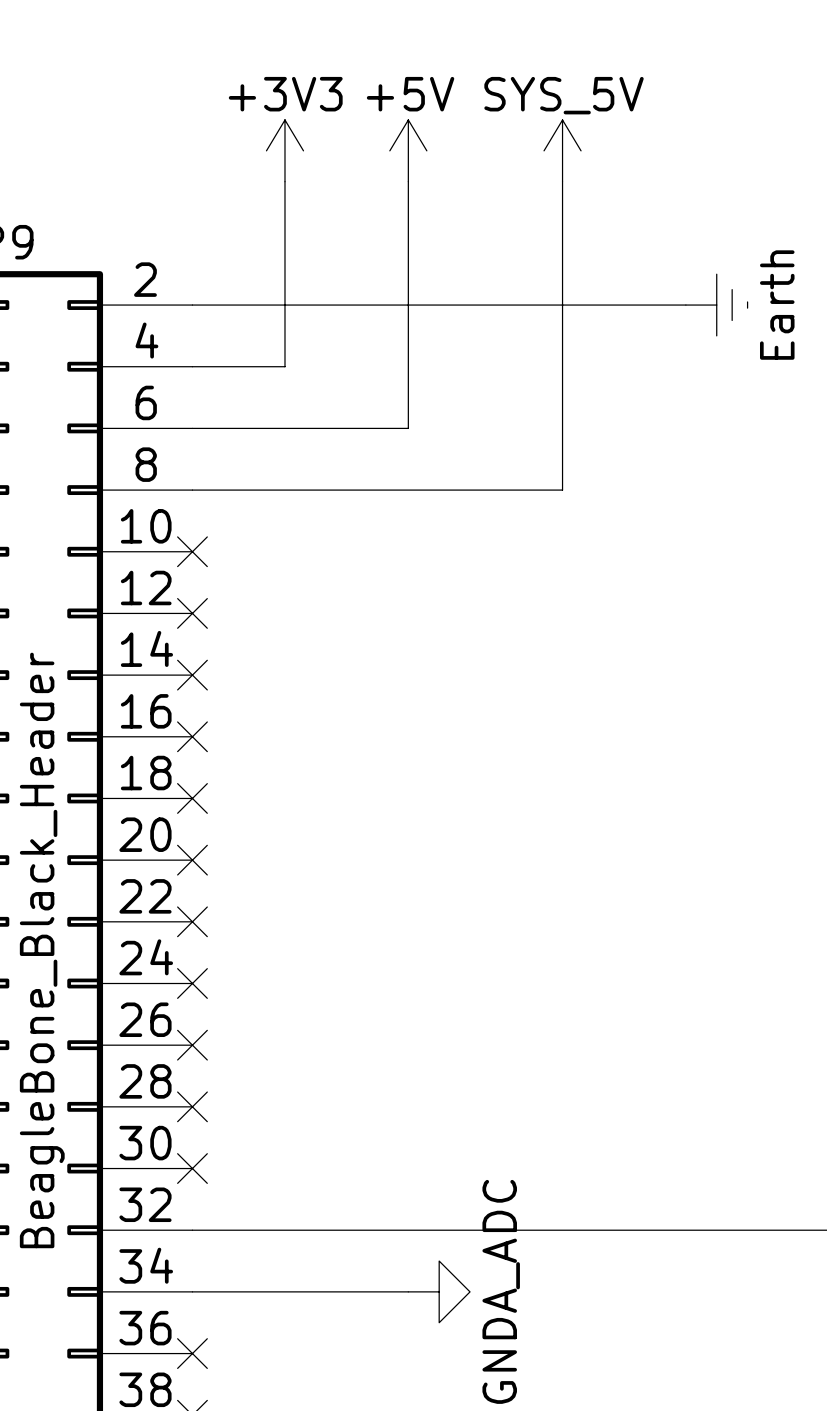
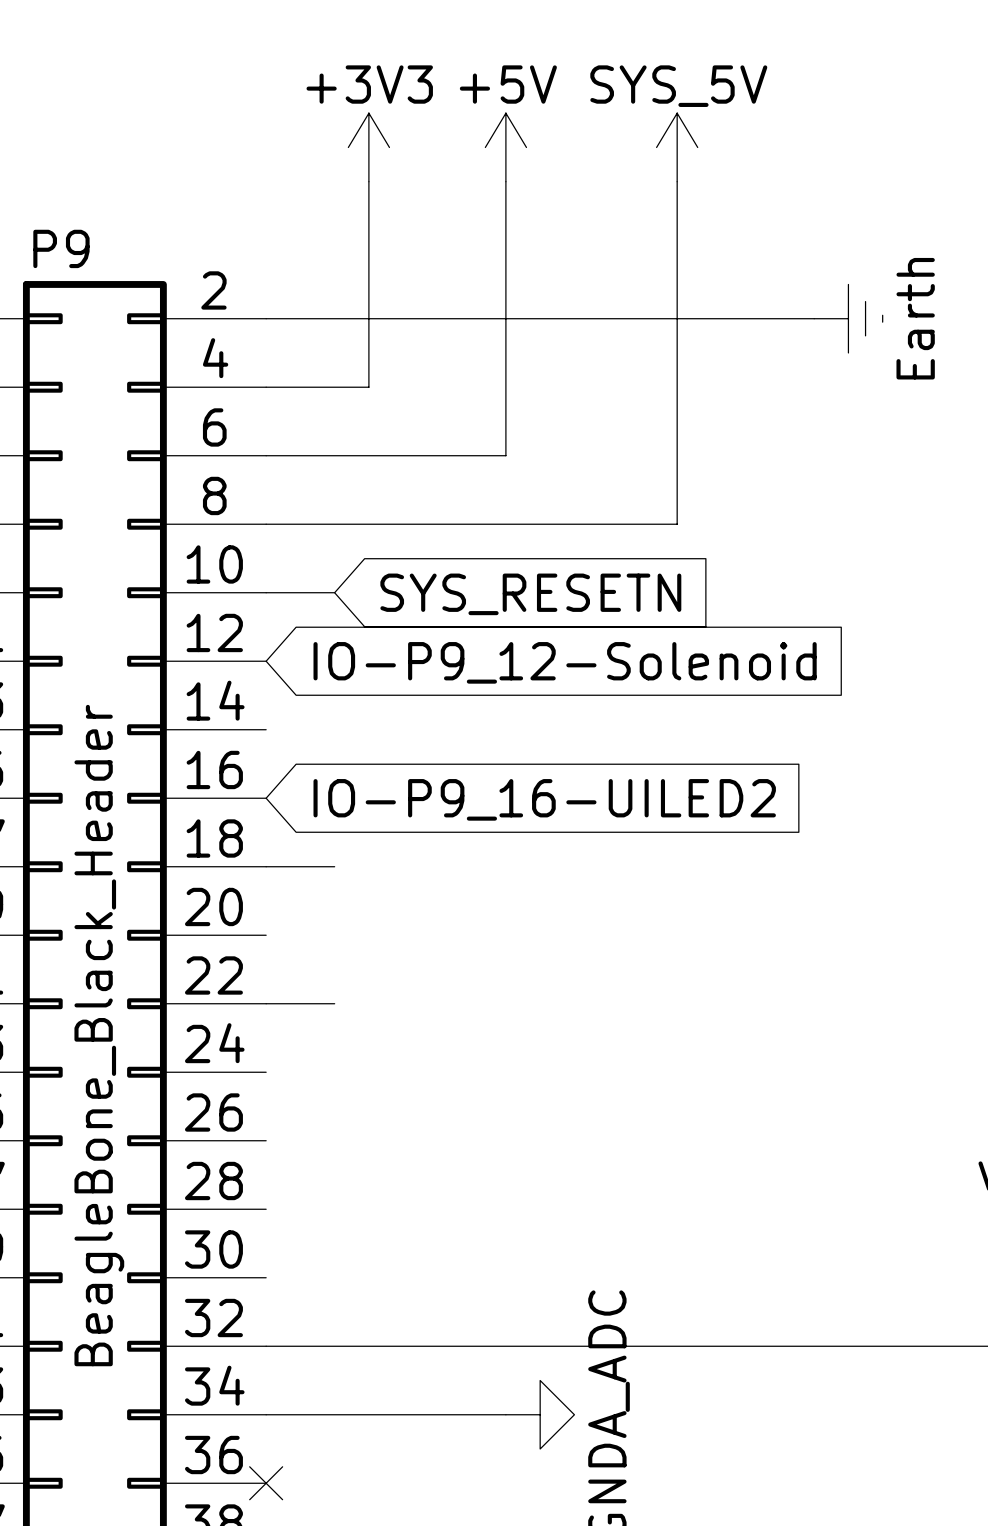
wire: none -> (266, 592) (334, 592)
no-connect mark: (192, 551) -> none
global label: none -> SYS_RESETN (530, 594)
no-connect mark: (192, 613) -> none
global label: none -> IO-P9_12-Solenoid (565, 662)
no-connect mark: (192, 675) -> none
no-connect mark: (192, 736) -> none
global label: none -> IO-P9_16-UILED2 (544, 799)
wire: none -> (266, 866) (334, 866)
no-connect mark: (192, 798) -> none
no-connect mark: (192, 860) -> none
wire: none -> (266, 1003) (334, 1003)
no-connect mark: (192, 921) -> none
no-connect mark: (192, 983) -> none
no-connect mark: (192, 1045) -> none
no-connect mark: (192, 1106) -> none
no-connect mark: (192, 1168) -> none

